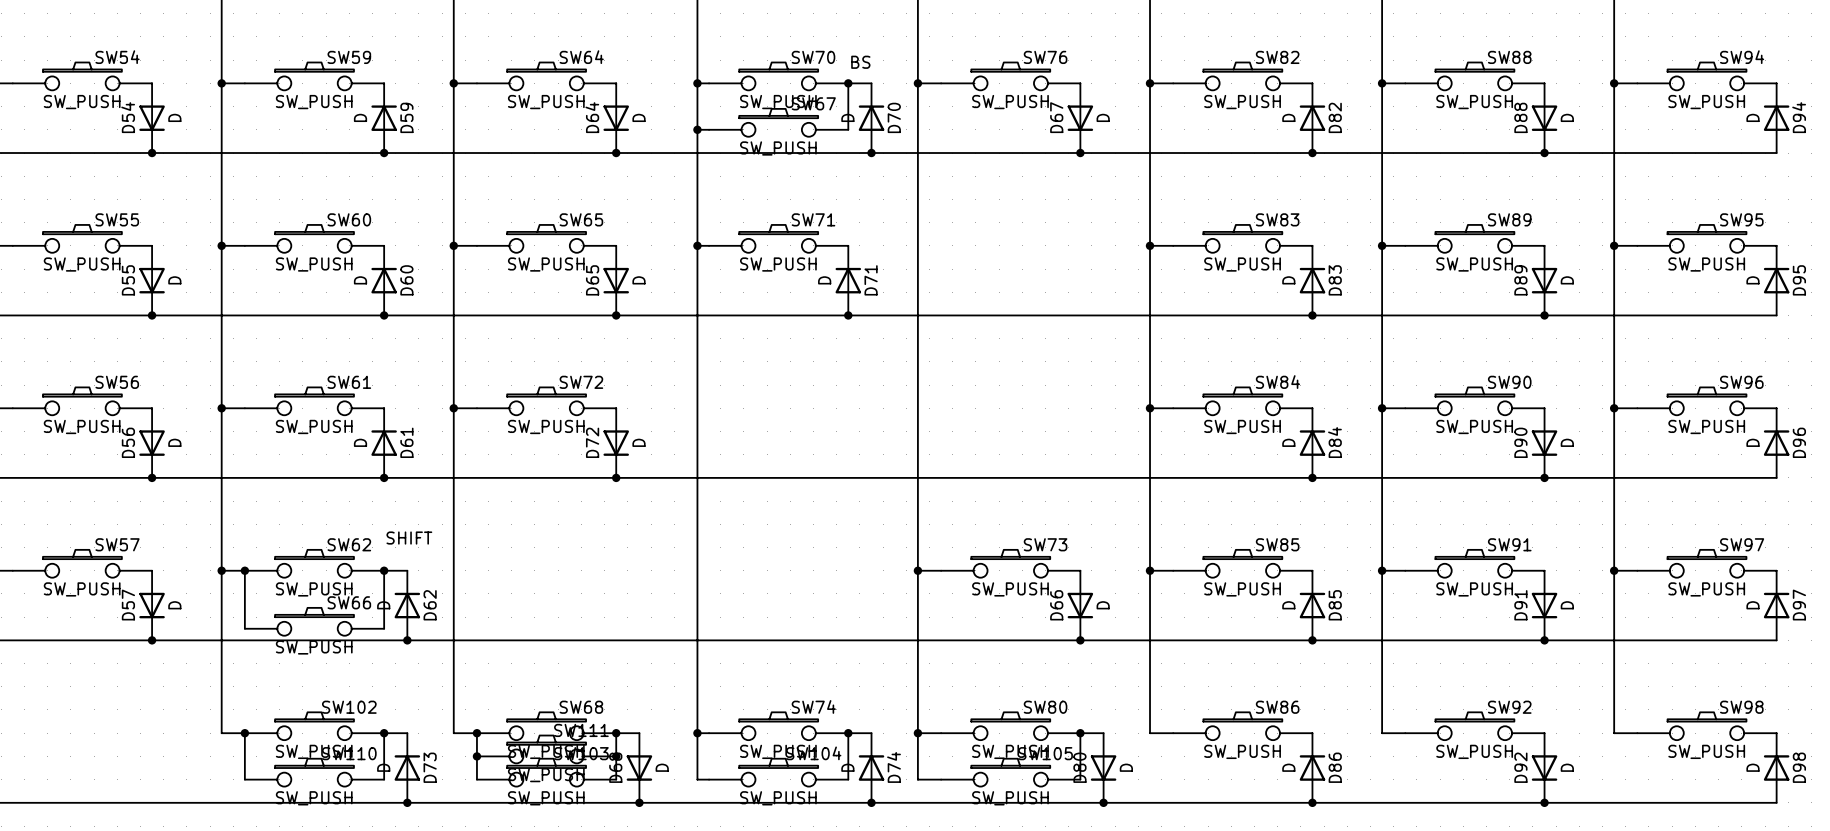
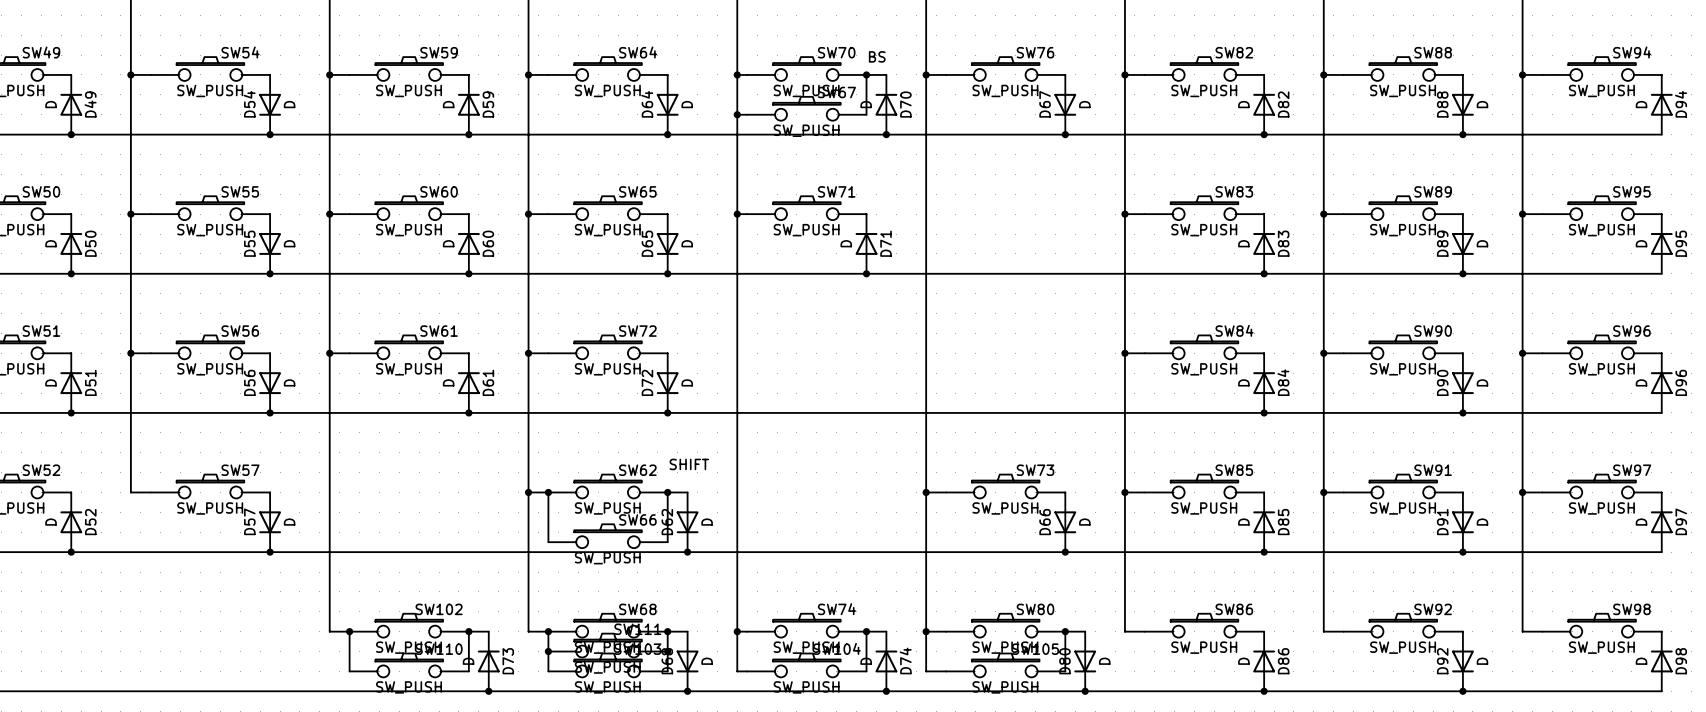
text: SHIFT (409, 538) -> none
text: none -> SHIFT (689, 464)
SW62 position: (314, 563) -> (608, 486)
wire: (221, 570) (244, 570) (244, 628) -> none
junction: (221, 570) -> none
junction: (244, 570) -> none
junction: (384, 570) -> none
wire: (407, 570) (384, 570) (384, 628) -> none
wire: none -> (528, 492) (548, 492) (548, 542)
junction: none -> (528, 492)
junction: none -> (548, 492)
junction: none -> (667, 492)
wire: none -> (687, 492) (667, 492) (667, 542)
D62 rotation: 0° (407, 605) -> 180° (687, 522)
D62 position: (407, 605) -> (687, 522)
SW66 position: (314, 621) -> (608, 536)
junction: (407, 640) -> none
junction: none -> (687, 552)

